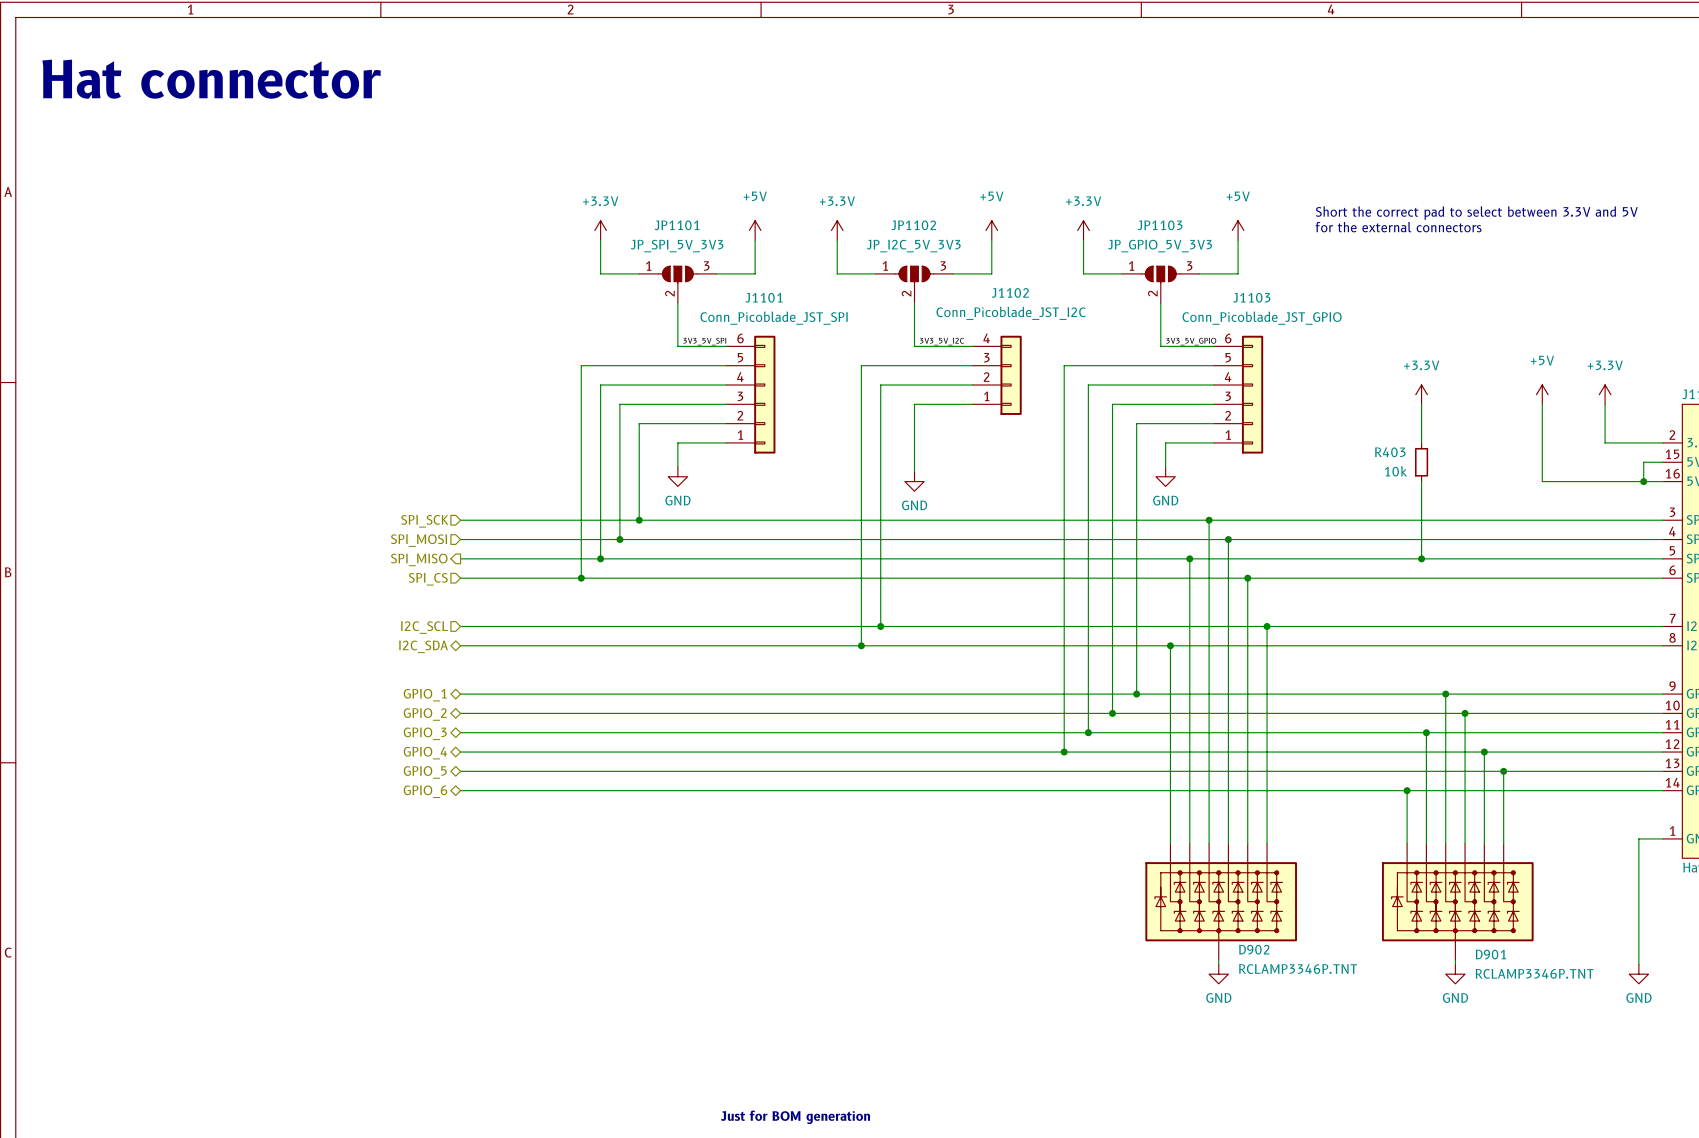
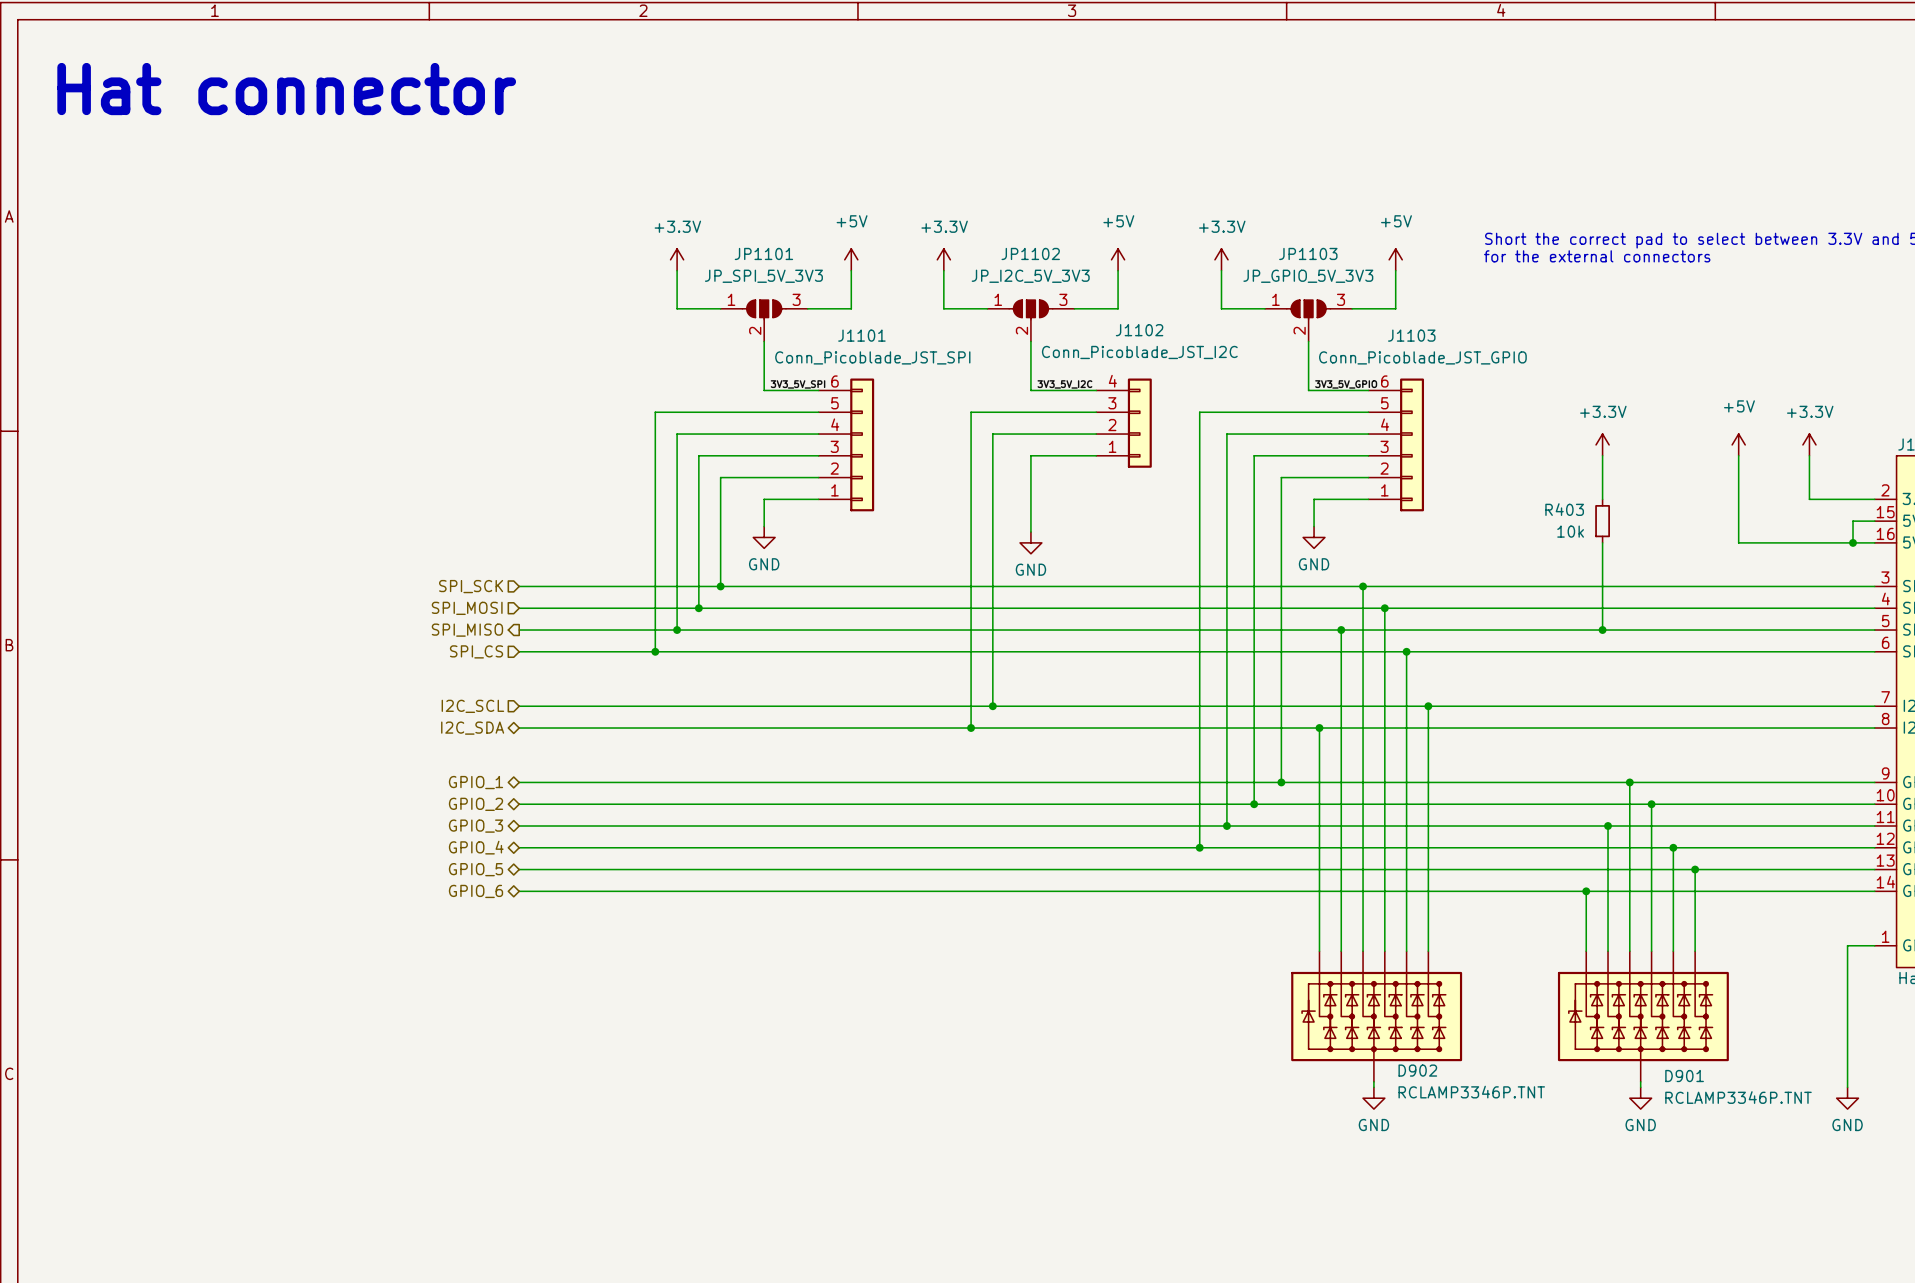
text: Just for BOM generation (795, 1117) -> none

